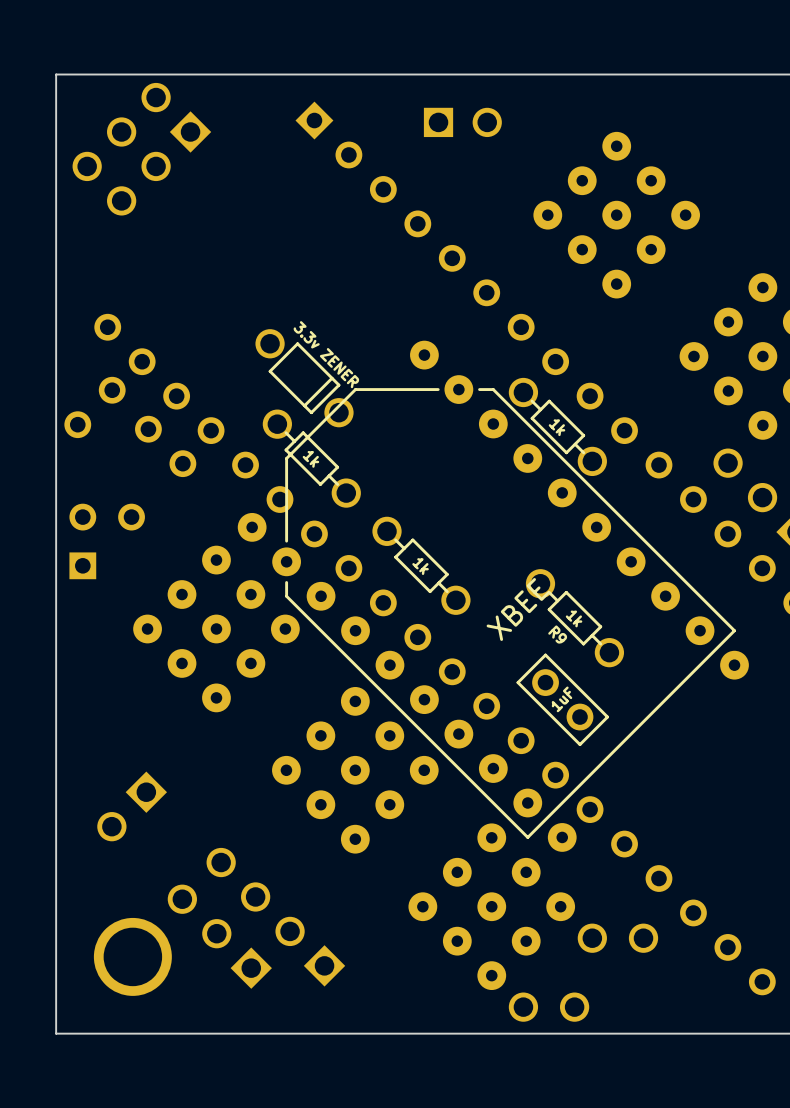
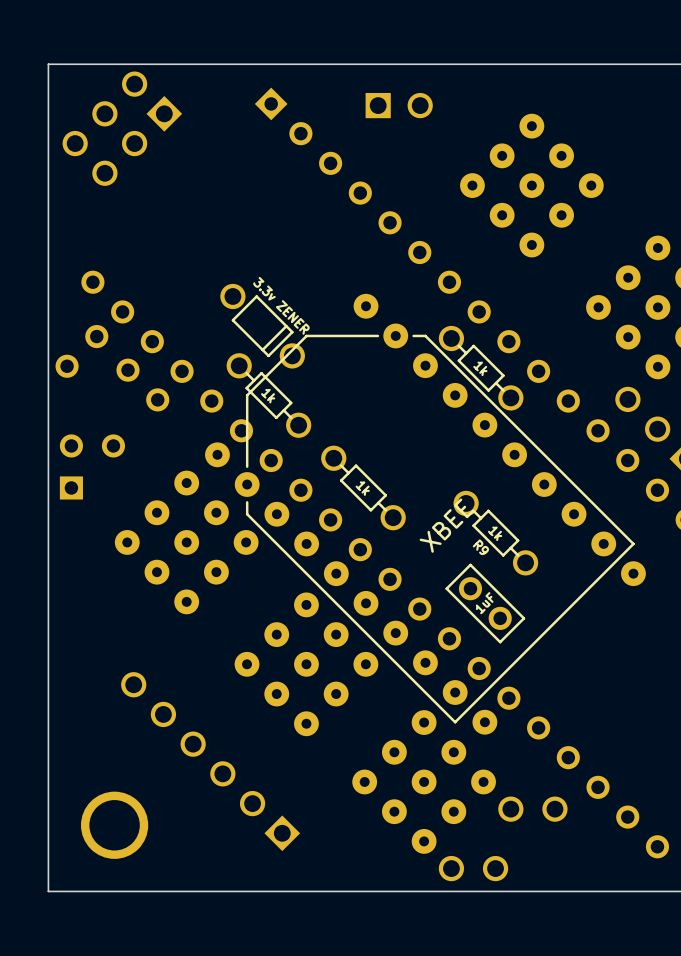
part: (132, 806) -> none
part: none -> (210, 761)
part: (275, 917) -> none
part: (219, 936) -> none

